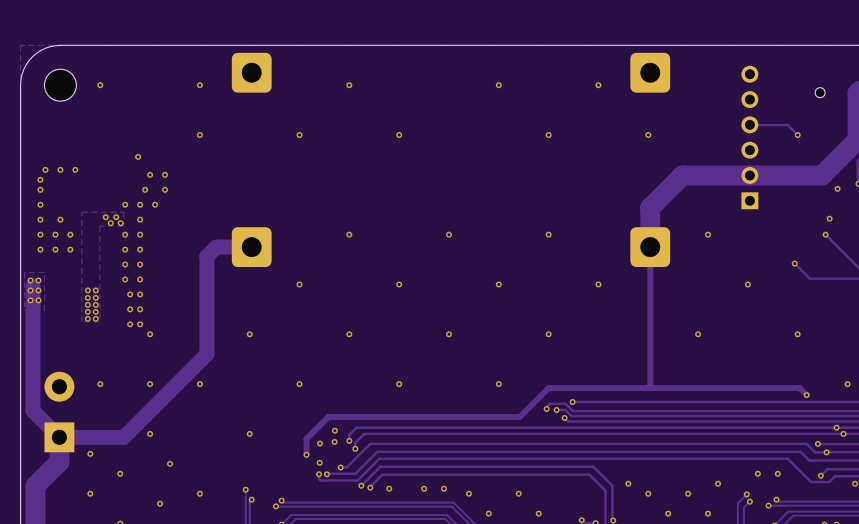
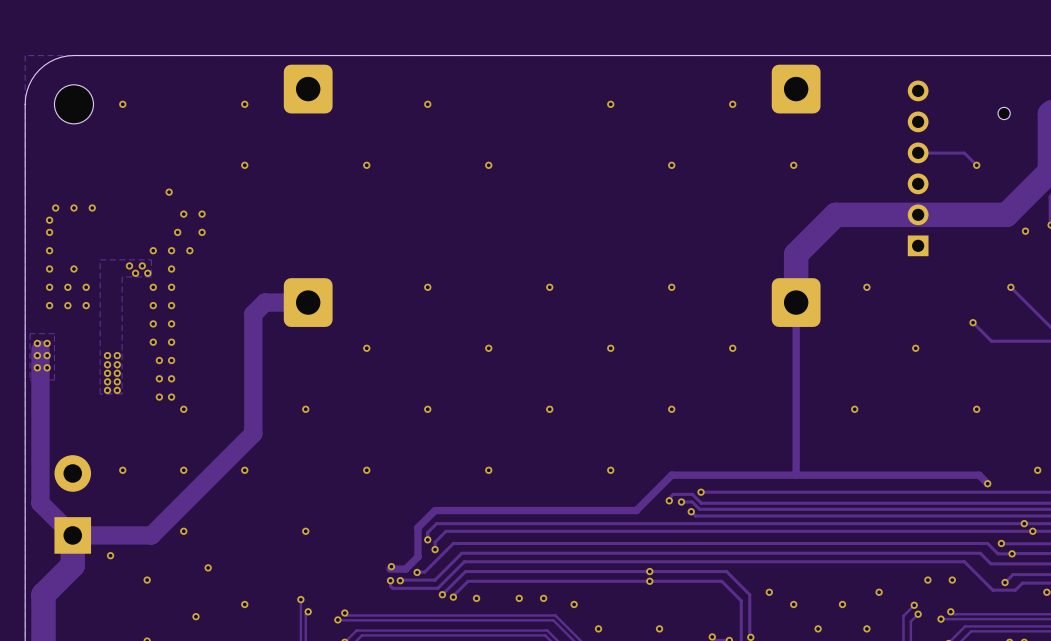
via: (829, 218) -> none
track: (355, 416) (328, 416) (306, 438) (306, 454) -> (435, 510) (417, 527) (417, 556) (405, 569) (389, 569)
via: (334, 430) -> none
via: (334, 441) -> none
via: (319, 443) -> none
via: (306, 454) -> none
via: none -> (649, 571)
via: none -> (649, 581)
via: (90, 493) -> none
via: (518, 493) -> none

